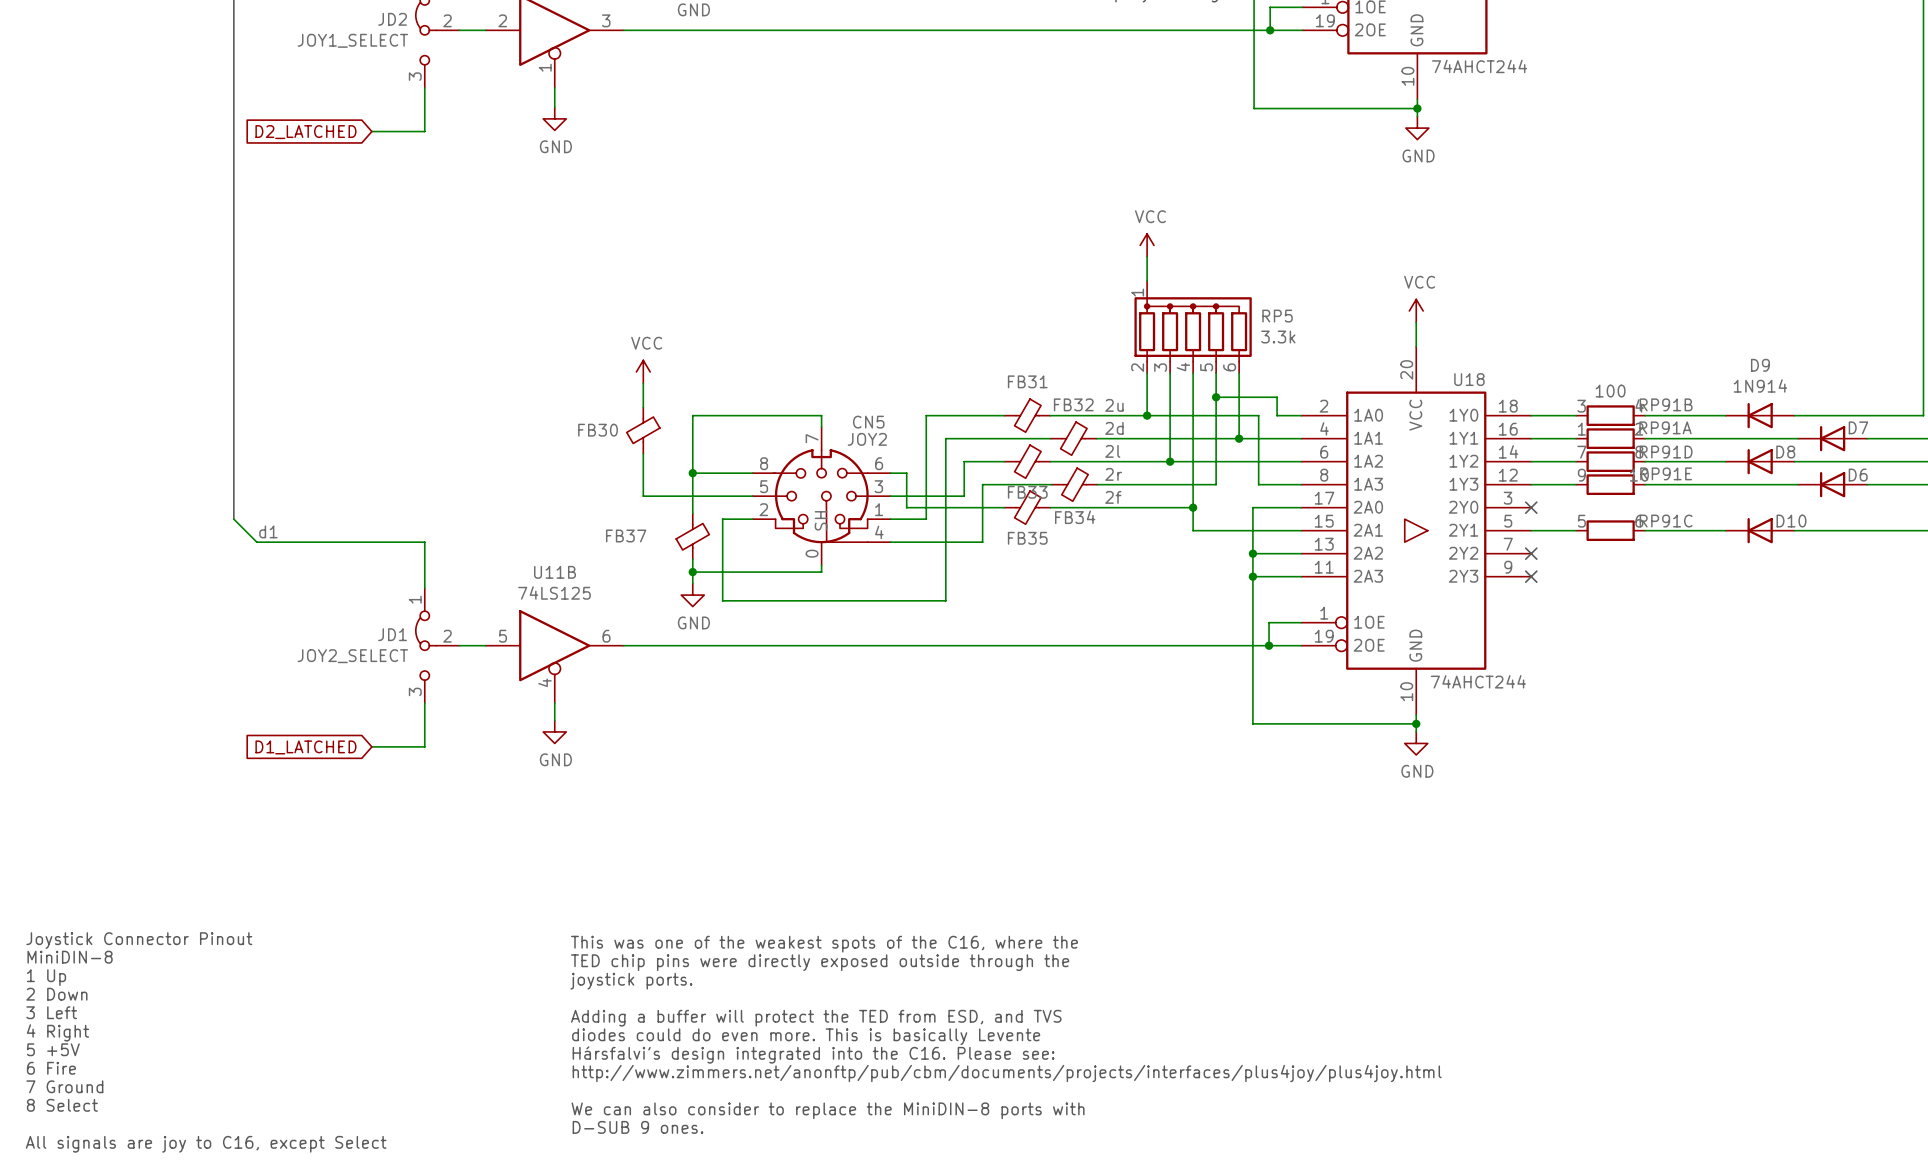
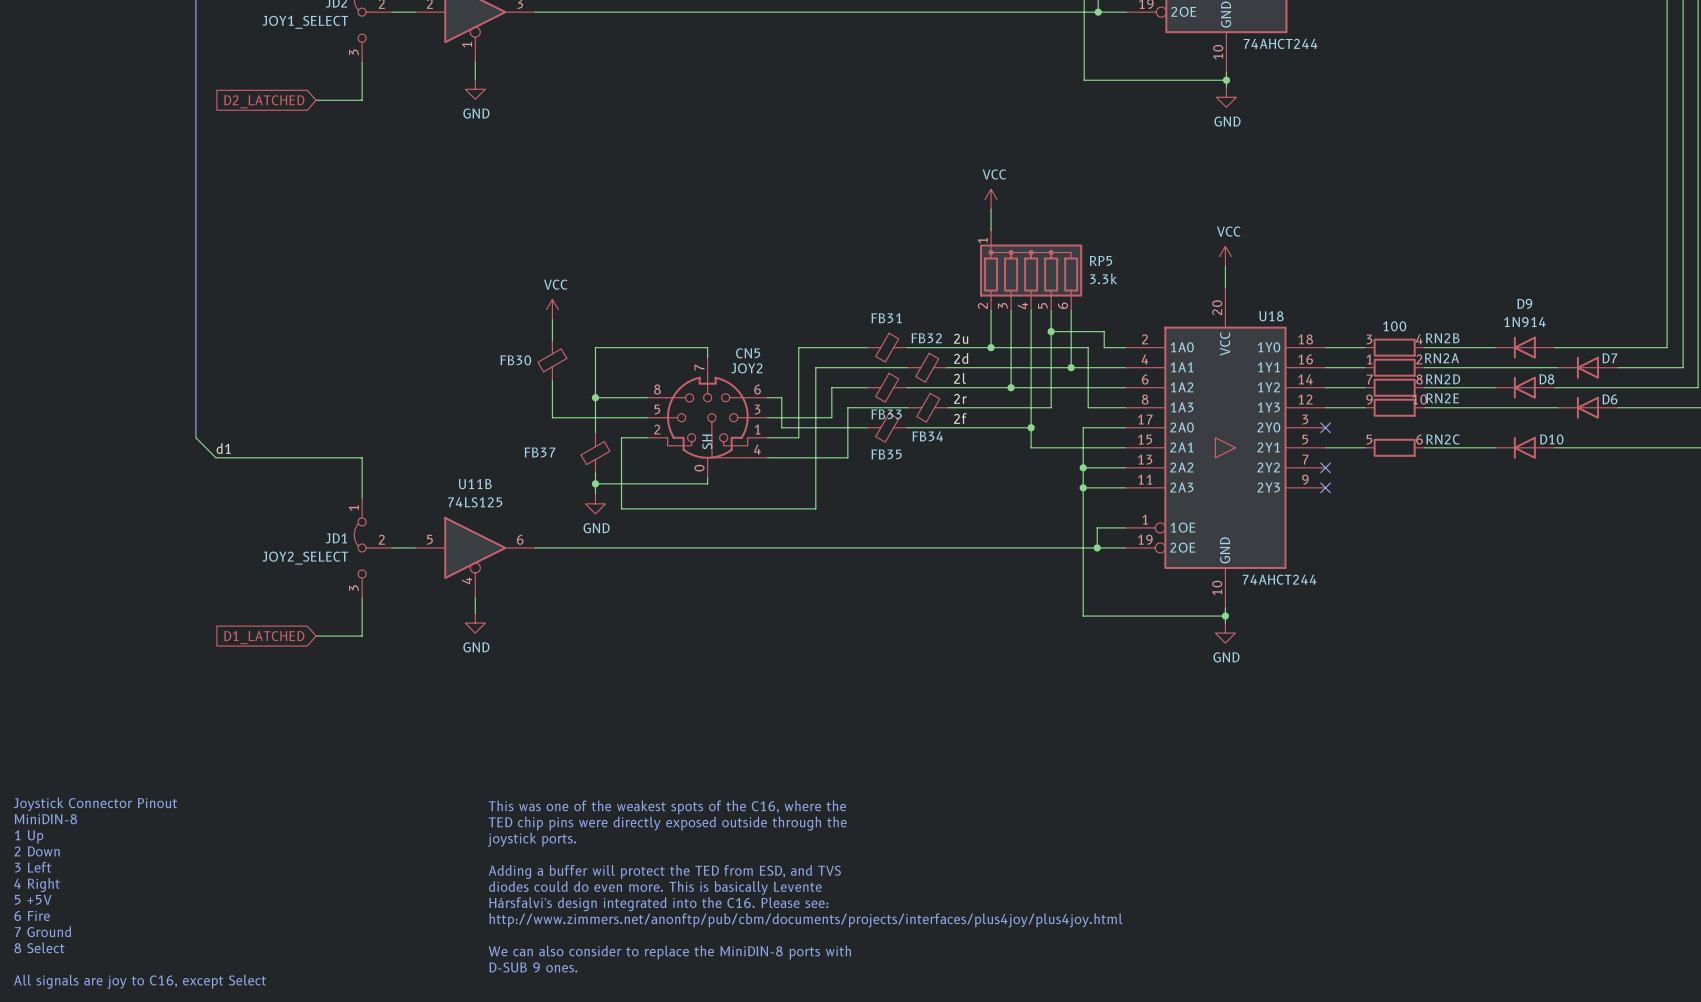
RP91B name: RP91B (1666, 404) -> RN2B (1442, 338)
RP91A name: RP91A (1665, 427) -> RN2A (1442, 358)
RP91D name: RP91D (1666, 452) -> RN2D (1443, 379)
RP91E name: RP91E (1666, 473) -> RN2E (1442, 398)
RP91C name: RP91C (1666, 521) -> RN2C (1442, 439)

